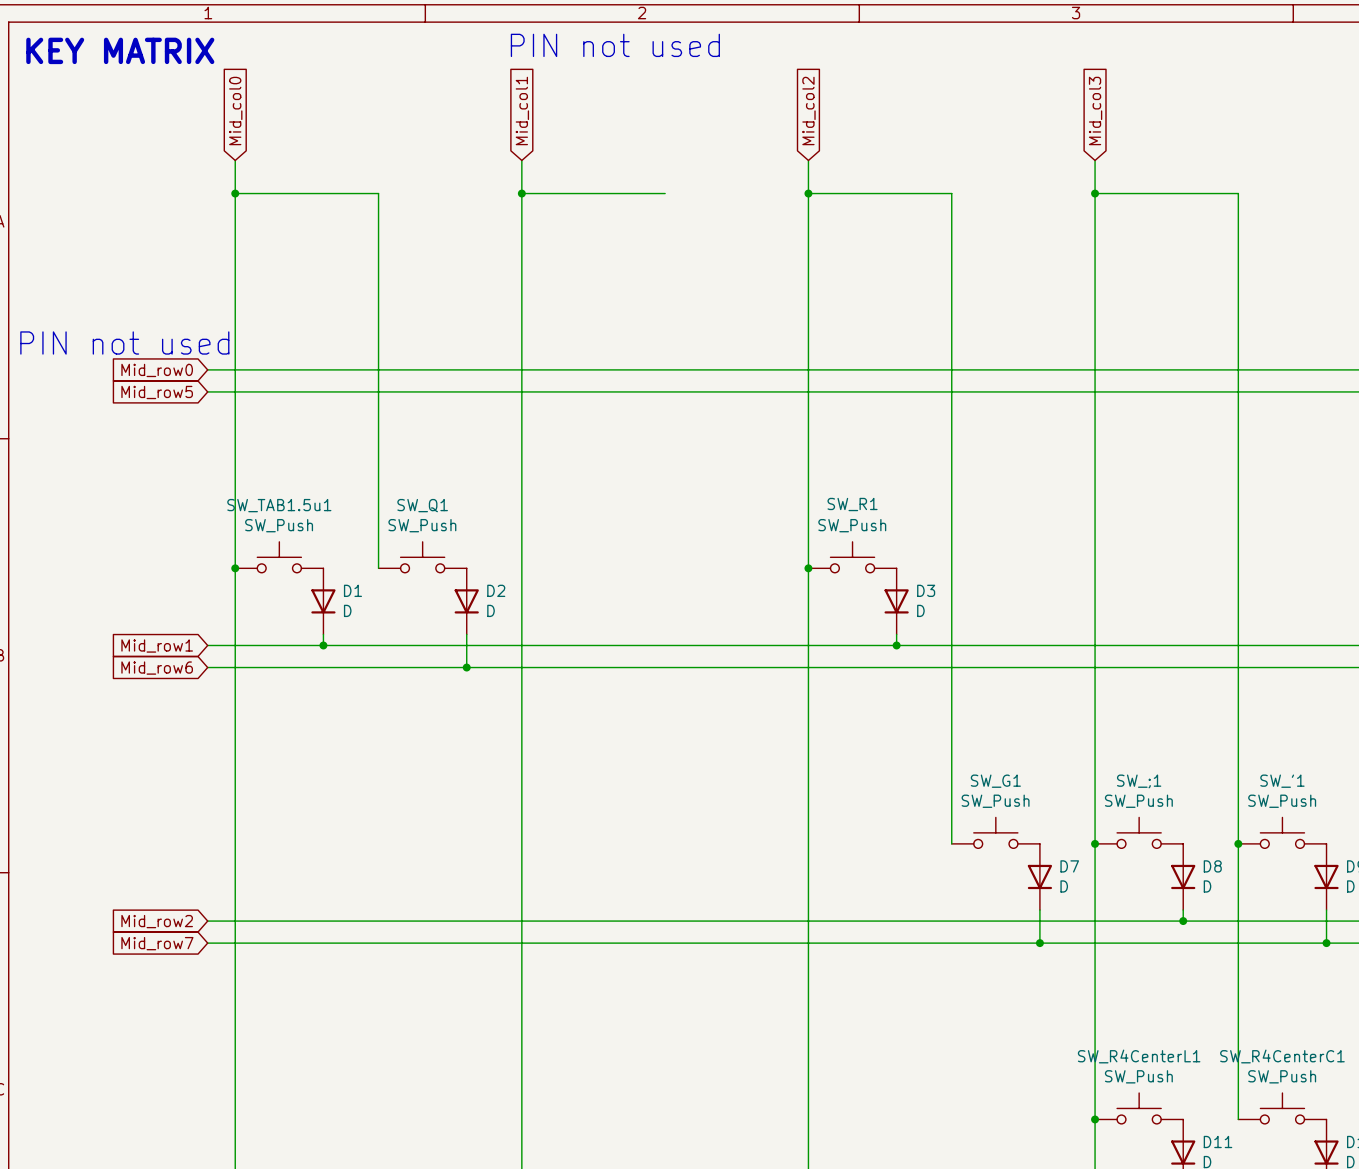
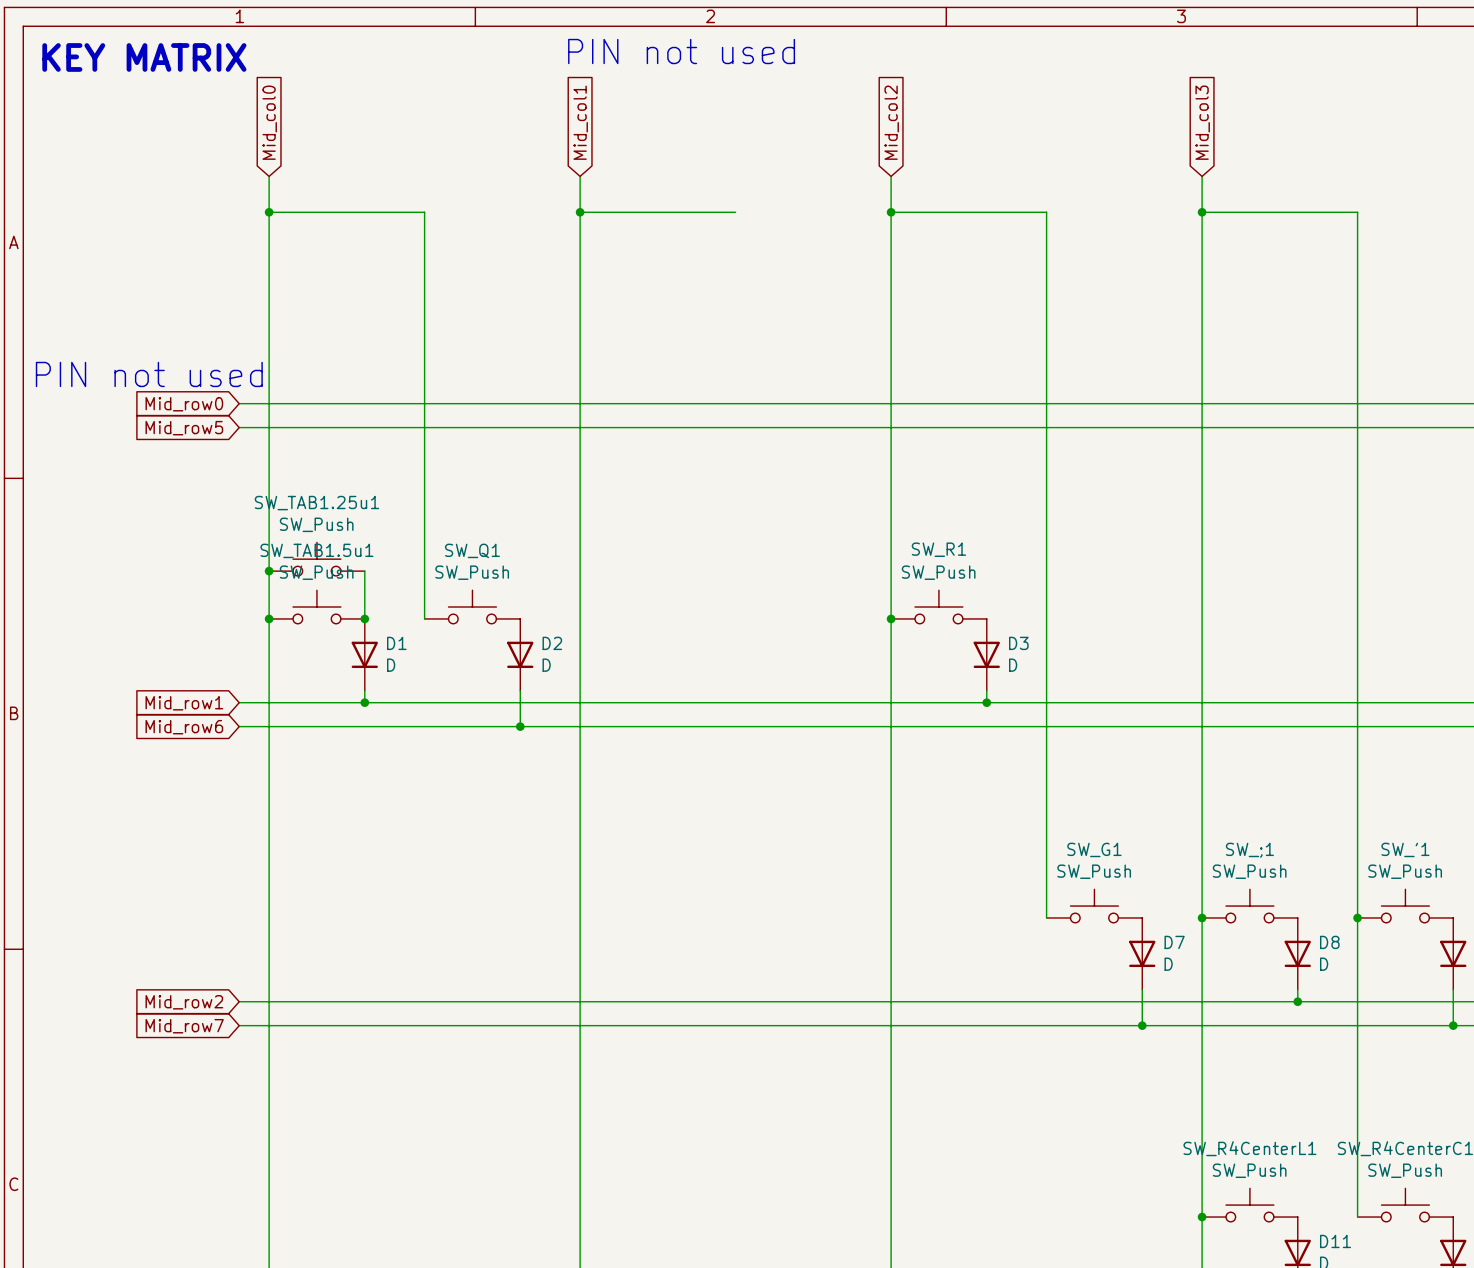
SW_TAB1.25u1: none -> SW_Push (316, 559)
junction: none -> (269, 571)
wire: none -> (364, 571) (364, 618)
junction: none -> (364, 618)

